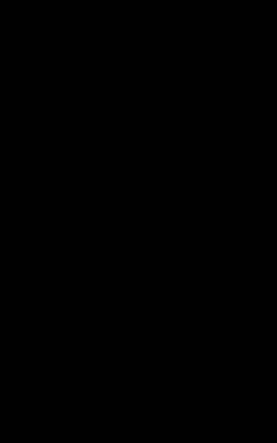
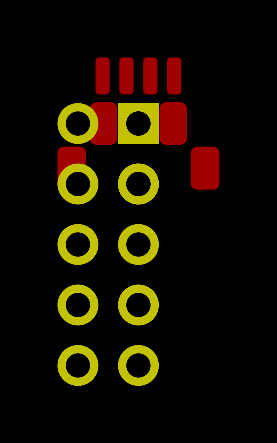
part: none -> (138, 123)
part: none -> (138, 123)
part: none -> (138, 153)
part: none -> (108, 244)

